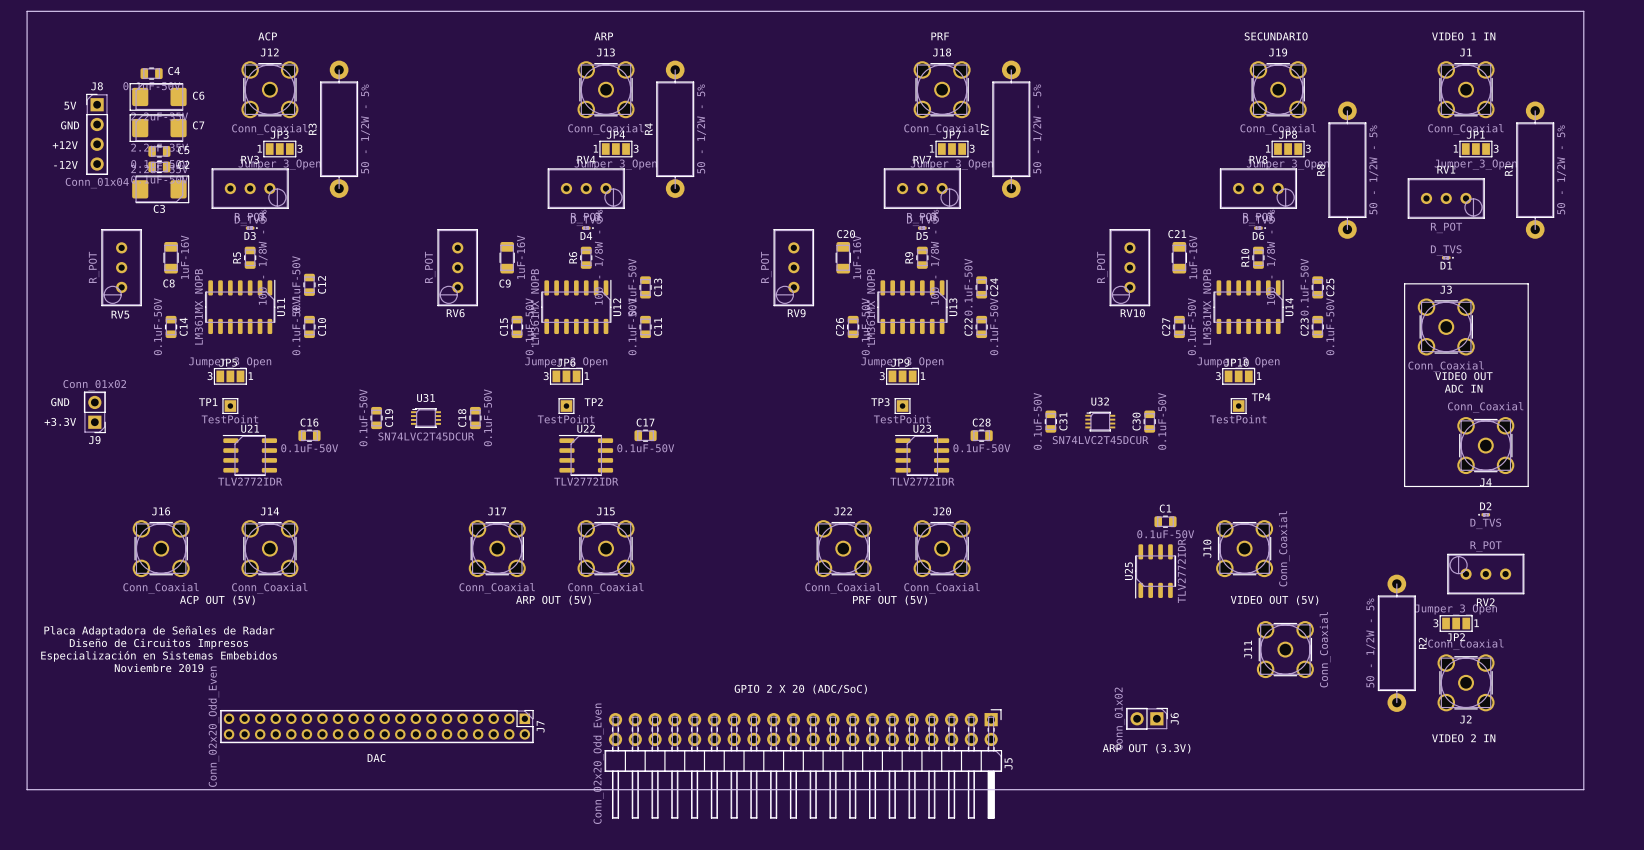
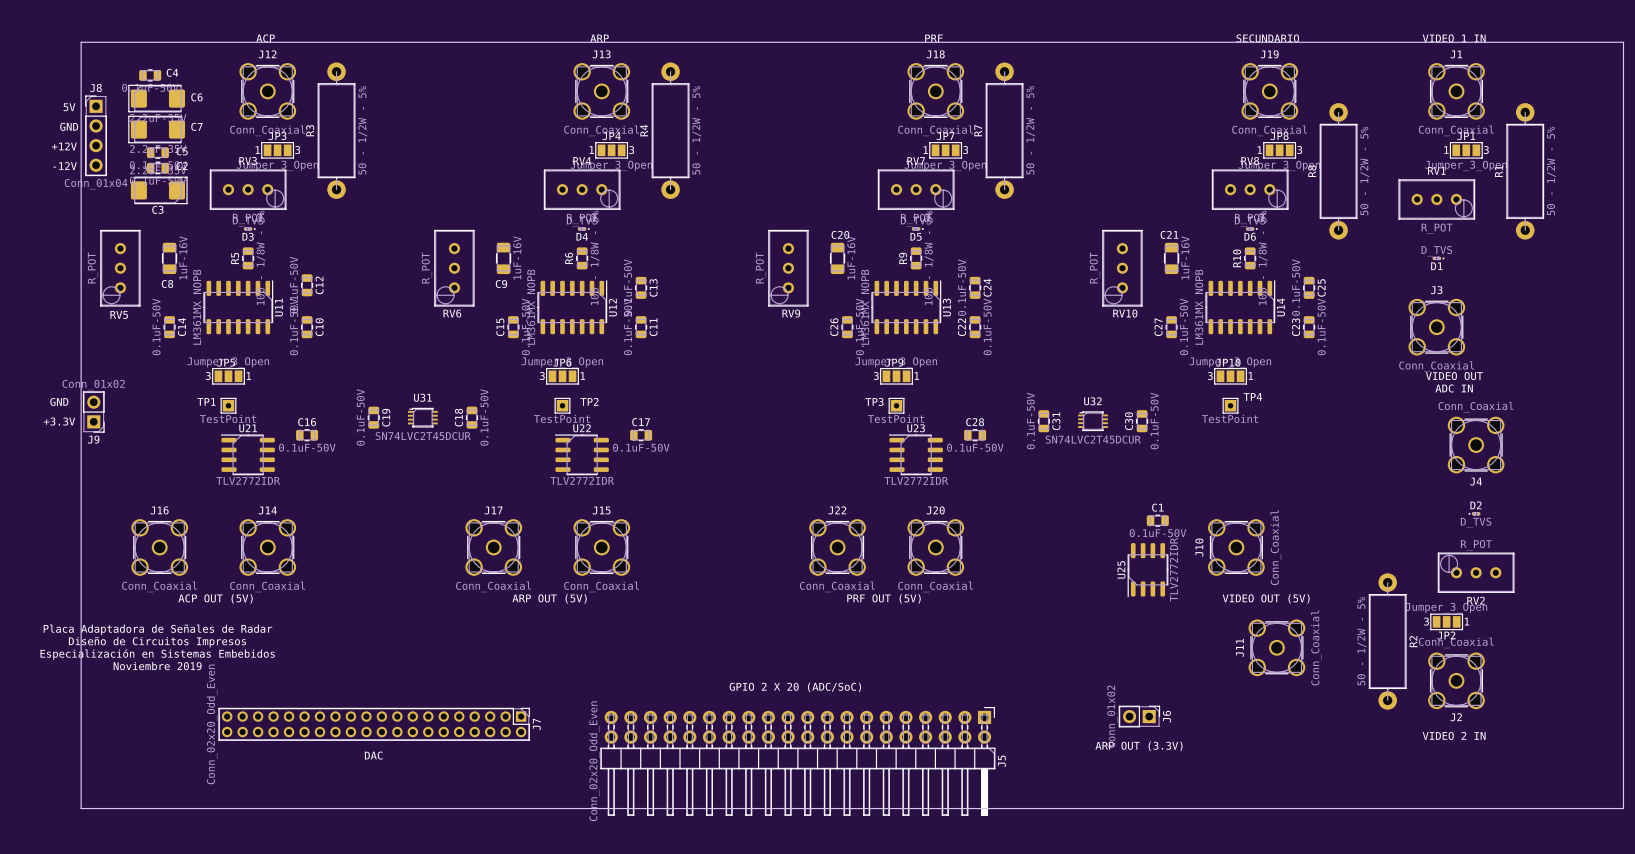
board edge: (27, 11) (27, 789) (1583, 789) (1583, 11) (27, 11) -> (81, 42) (81, 808) (1623, 808) (1623, 42) (81, 42)
line: (1404, 283) (1404, 486) (1528, 486) (1528, 283) (1404, 283) -> none

